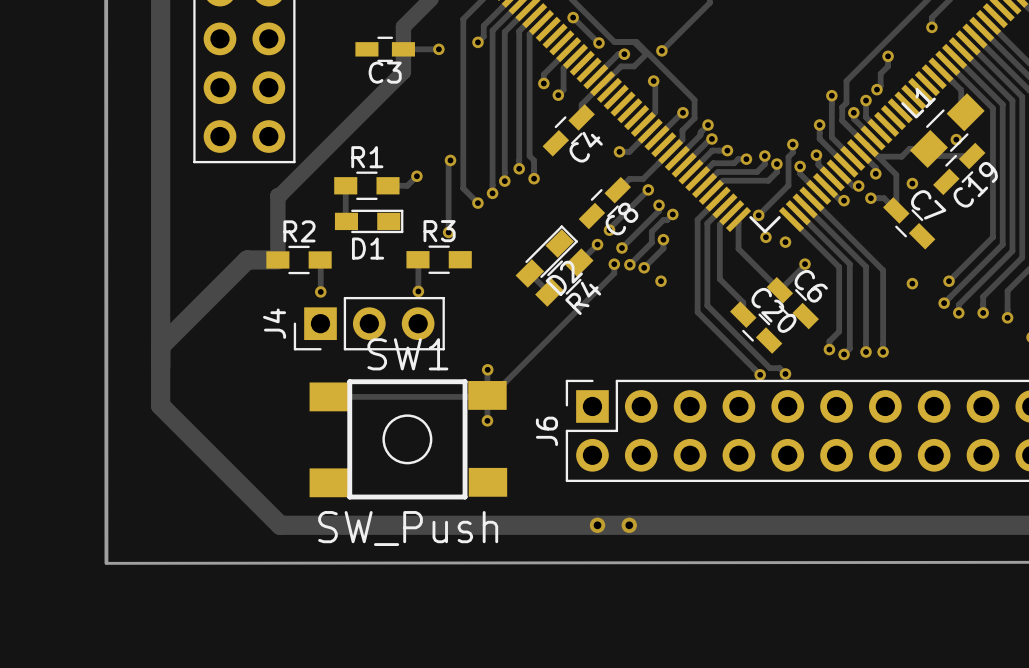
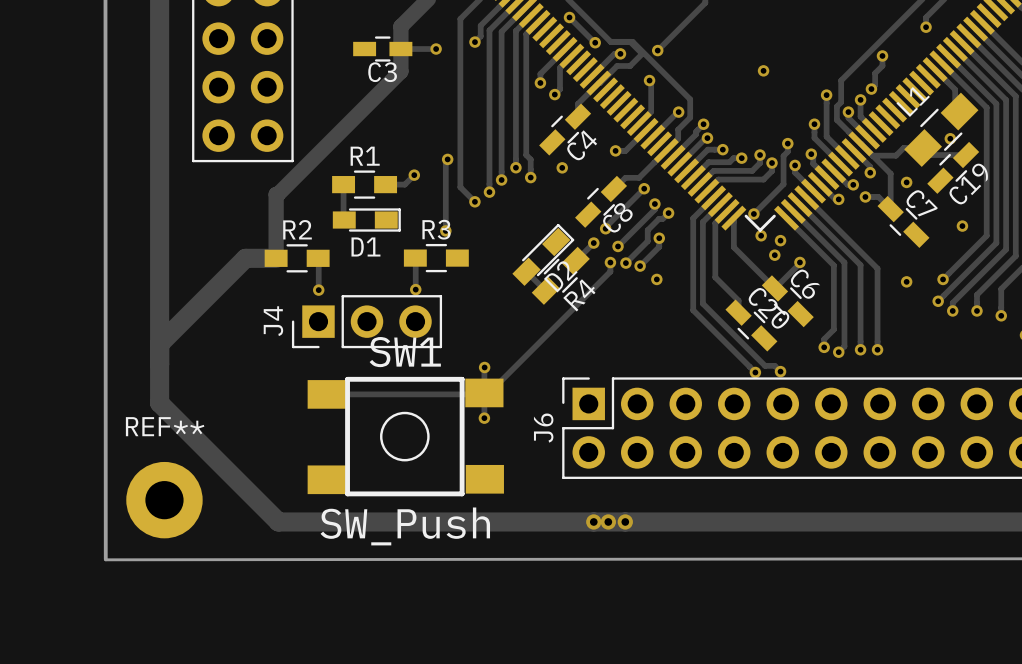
via: none -> (763, 70)
via: none -> (562, 167)
via: none -> (962, 226)
via: none -> (774, 255)
REF**: none -> (164, 500)
via: none -> (608, 521)

